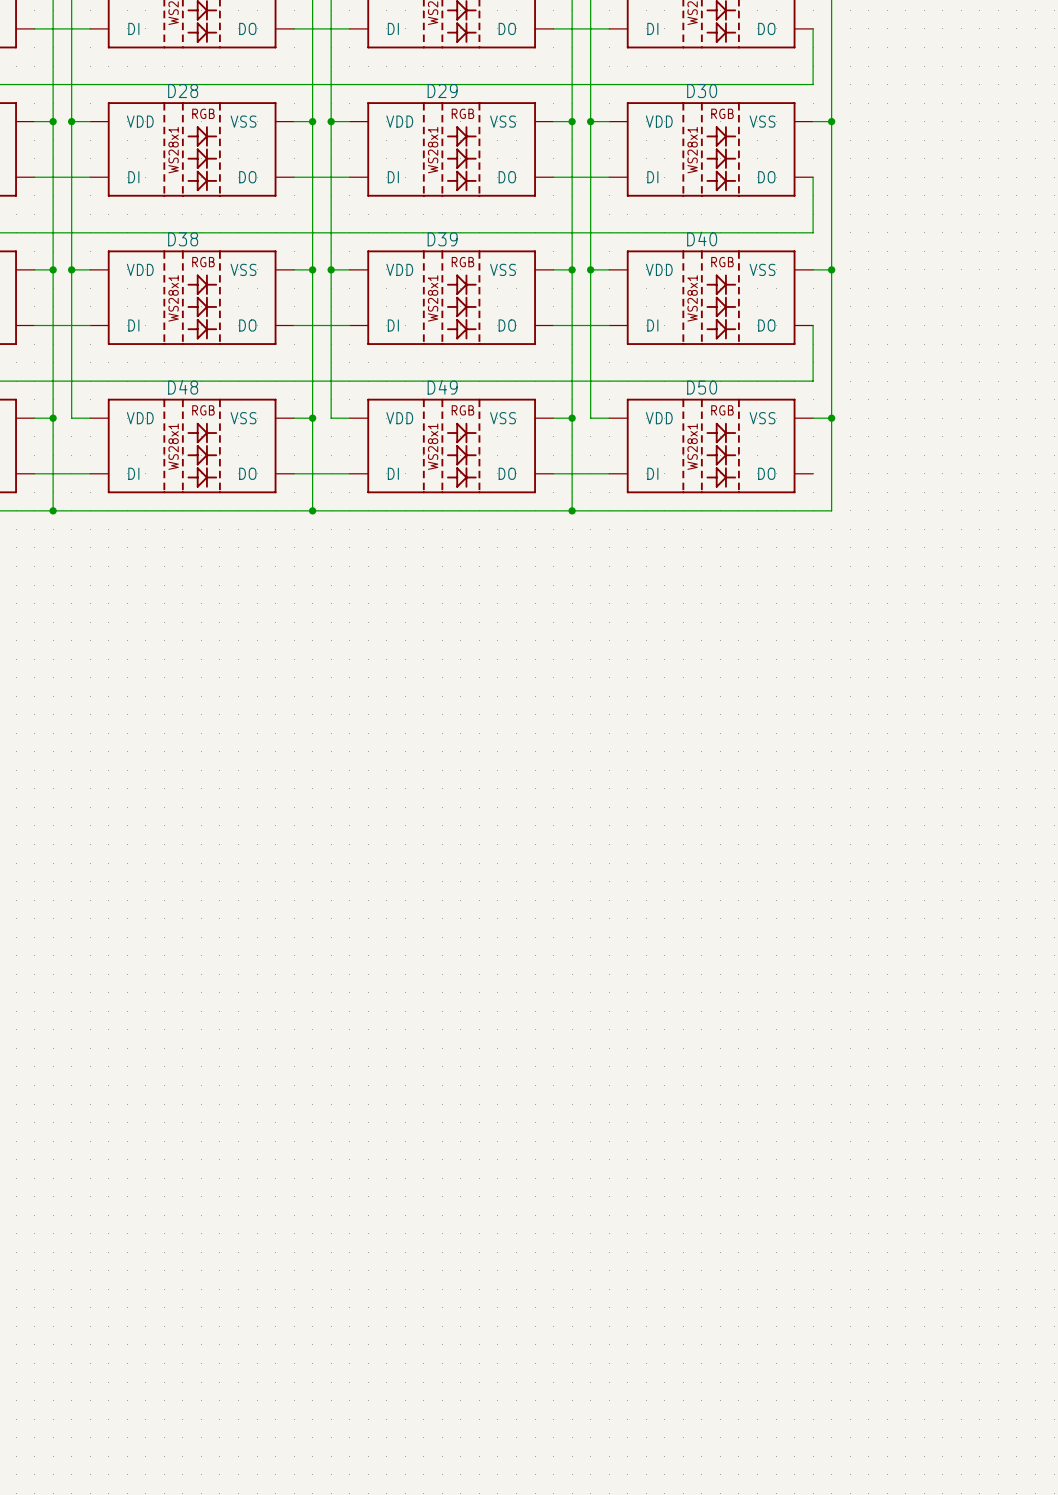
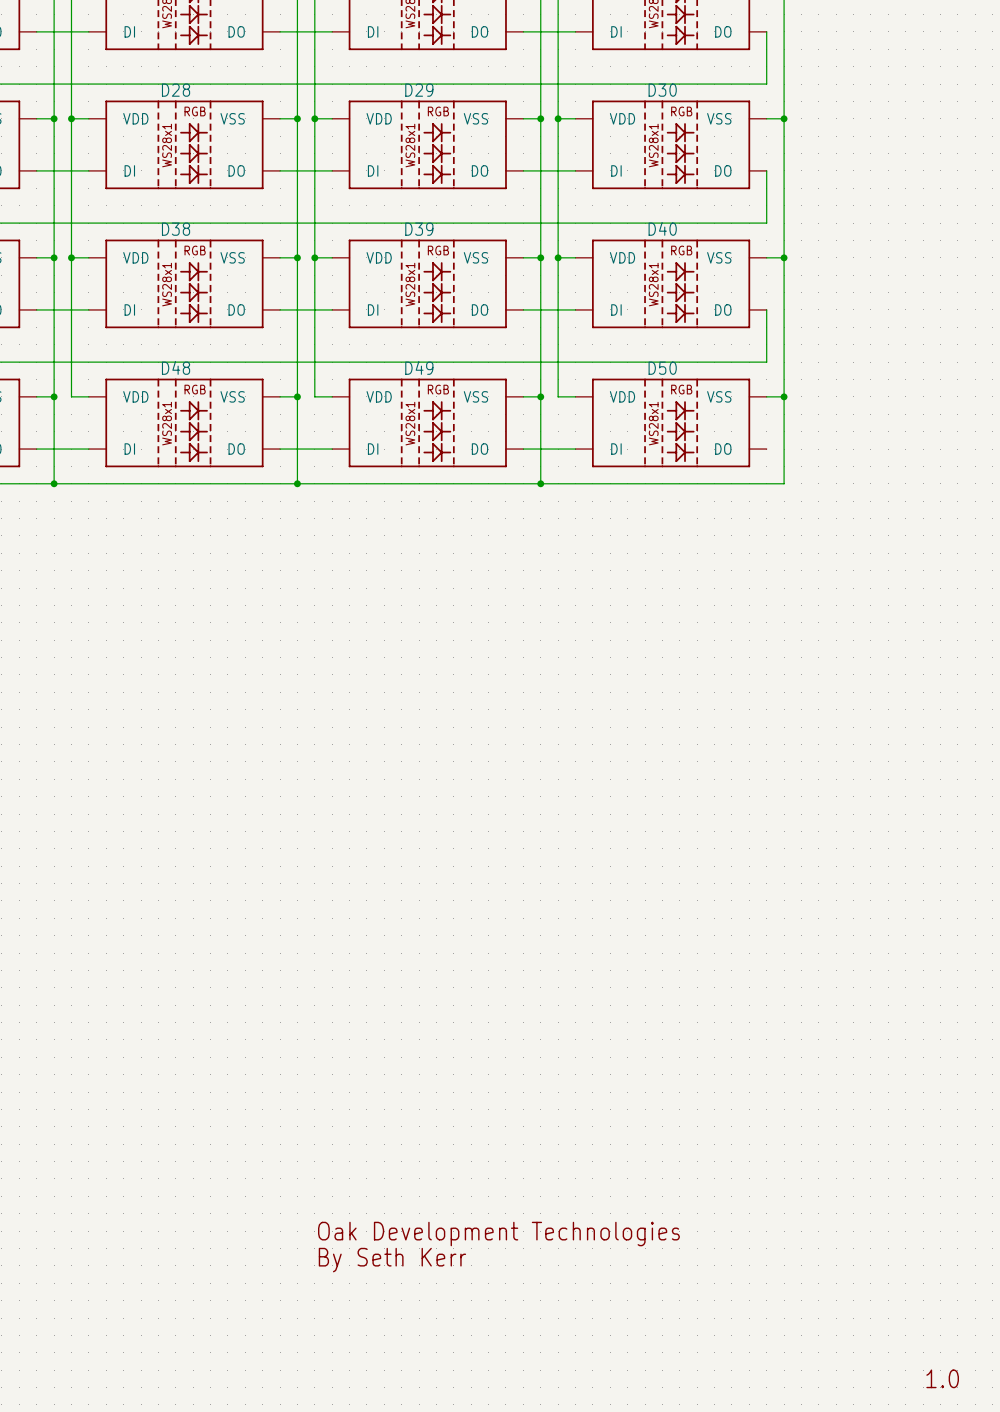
text: none -> Oak Development Technologies (498, 1234)
text: none -> By Seth Kerr (392, 1260)
text: none -> 1.0 (942, 1378)

